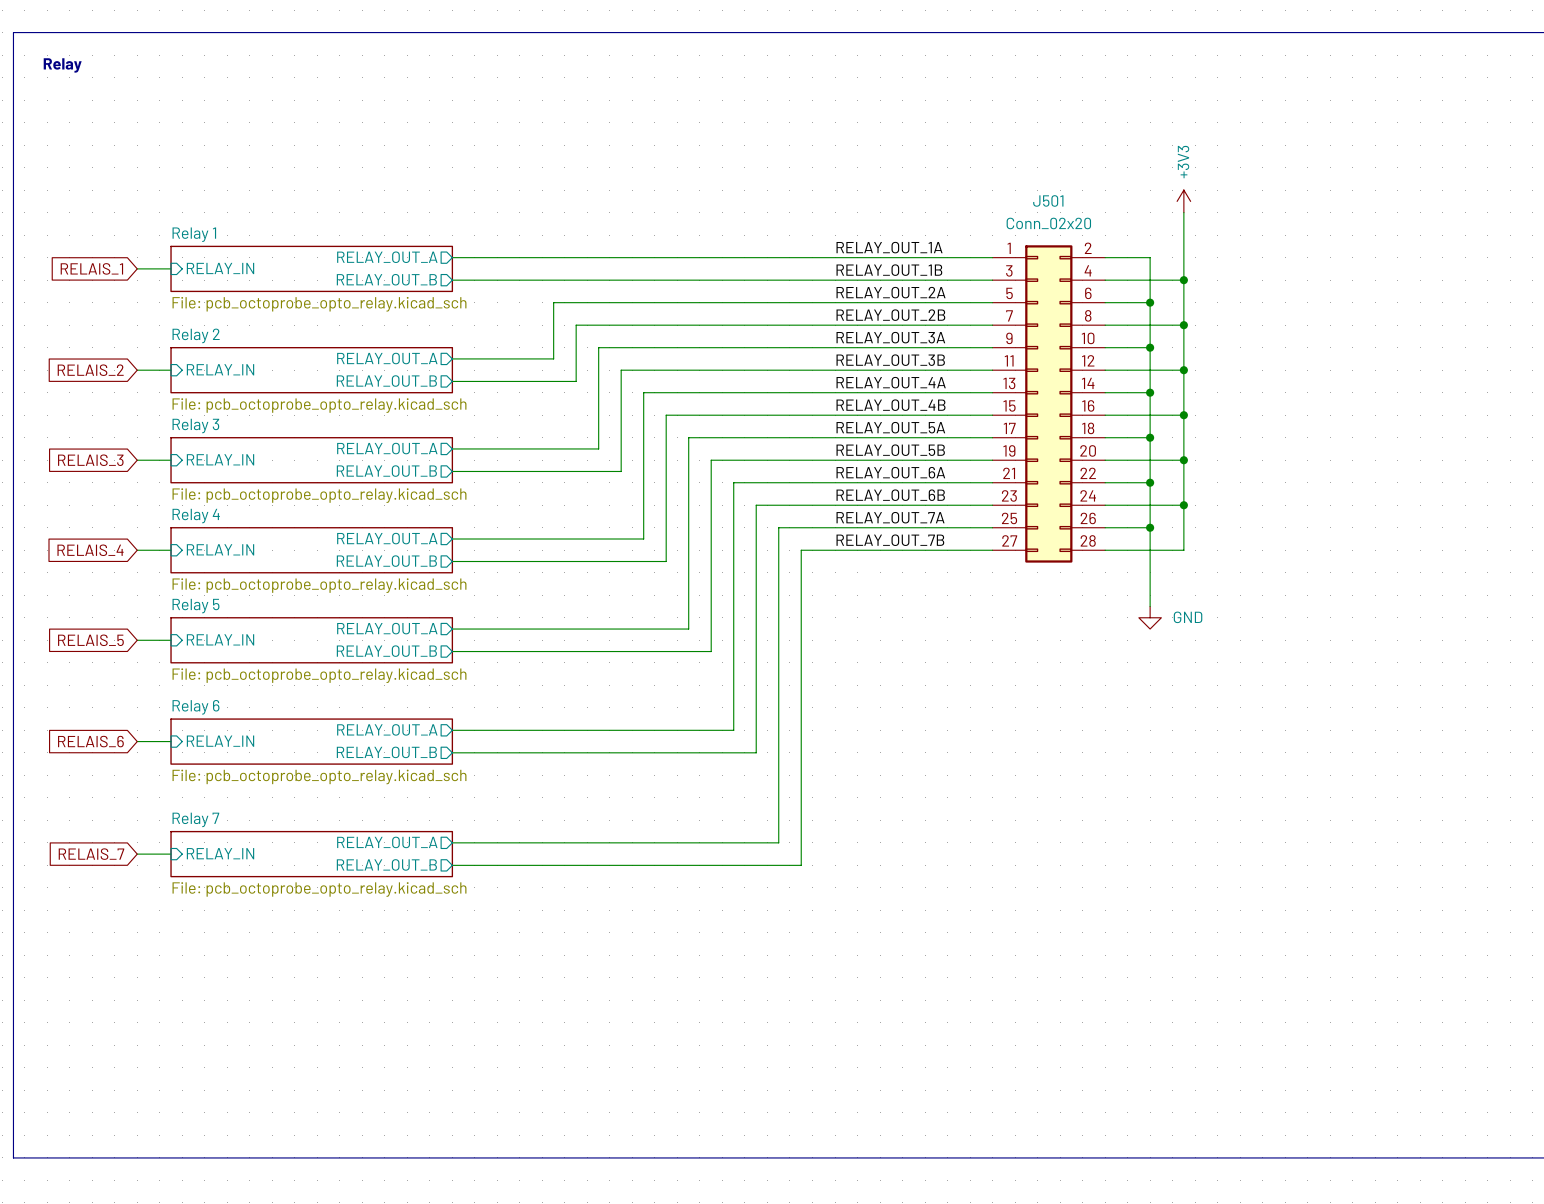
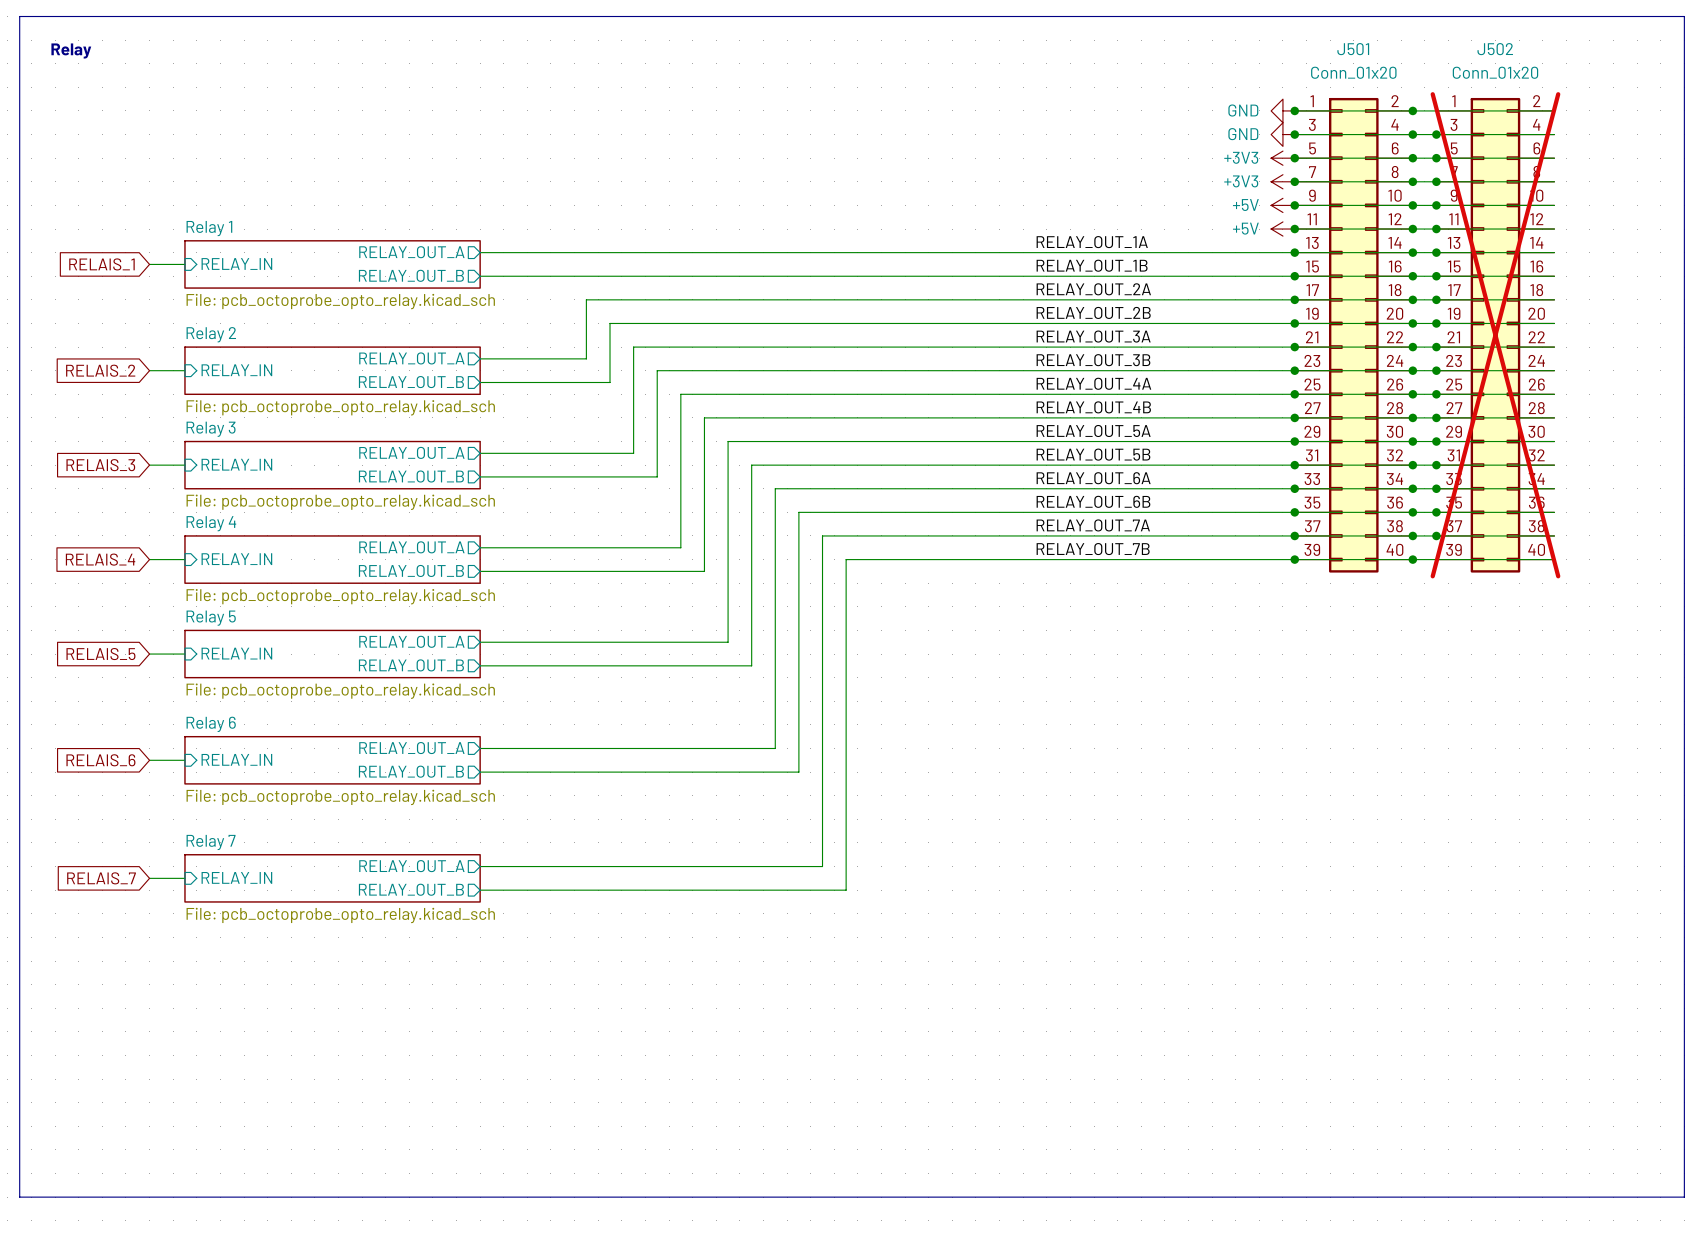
power symbol: none -> GND (1282, 110)
wire: none -> (1294, 110) (1554, 110)
junction: none -> (1294, 110)
junction: none -> (1412, 110)
power symbol: none -> GND (1282, 134)
wire: none -> (1294, 134) (1554, 134)
junction: none -> (1294, 134)
junction: none -> (1412, 134)
junction: none -> (1436, 134)
power symbol: none -> +3V3 (1282, 158)
wire: none -> (1294, 158) (1554, 158)
junction: none -> (1294, 158)
junction: none -> (1412, 158)
junction: none -> (1436, 158)
power symbol: none -> +3V3 (1282, 181)
wire: none -> (1294, 181) (1554, 181)
junction: none -> (1294, 181)
junction: none -> (1412, 181)
junction: none -> (1436, 181)
J501 name position: J501 (1048, 200) -> J501 (1353, 49)
power symbol: +3V3 (1183, 201) -> none
wire: (1183, 212) (1183, 550) -> (1554, 559) (1247, 559)
power symbol: none -> +5V (1282, 205)
wire: none -> (1294, 205) (1554, 205)
junction: none -> (1294, 205)
junction: none -> (1412, 205)
junction: none -> (1436, 205)
J501 value: Conn_02x20 (1048, 223) -> Conn_01x20 (1353, 72)
power symbol: none -> +5V (1282, 229)
wire: none -> (1294, 229) (1554, 229)
junction: none -> (1294, 229)
junction: none -> (1412, 229)
junction: none -> (1436, 229)
J501 symbol: [992, 245, 1106, 563] -> [1294, 97, 1413, 573]
label position: RELAY_OUT_1A (889, 247) -> RELAY_OUT_1A (1092, 242)
wire: (1150, 257) (1150, 606) -> (1212, 252) (1554, 252)
junction: none -> (1294, 252)
junction: none -> (1412, 252)
junction: none -> (1436, 252)
label position: RELAY_OUT_1B (889, 270) -> RELAY_OUT_1B (1092, 265)
wire: none -> (1247, 276) (1554, 276)
junction: (1183, 280) -> none
junction: none -> (1294, 276)
junction: none -> (1412, 276)
junction: none -> (1436, 276)
label position: RELAY_OUT_2A (891, 292) -> RELAY_OUT_2A (1093, 289)
wire: none -> (1212, 299) (1554, 299)
junction: (1150, 302) -> none
junction: none -> (1294, 299)
junction: none -> (1412, 299)
junction: none -> (1436, 299)
label position: RELAY_OUT_2B (890, 315) -> RELAY_OUT_2B (1093, 312)
wire: none -> (1247, 323) (1554, 323)
junction: (1183, 325) -> none
junction: none -> (1294, 323)
junction: none -> (1412, 323)
junction: none -> (1436, 323)
J502: none -> Conn_01x20 (1495, 335)
label position: RELAY_OUT_3A (890, 337) -> RELAY_OUT_3A (1093, 336)
wire: none -> (1212, 347) (1554, 347)
junction: (1150, 347) -> none
junction: none -> (1294, 347)
junction: none -> (1412, 347)
junction: none -> (1436, 347)
label position: RELAY_OUT_3B (890, 360) -> RELAY_OUT_3B (1093, 360)
wire: none -> (1247, 370) (1554, 370)
junction: (1183, 370) -> none
junction: none -> (1294, 370)
junction: none -> (1412, 370)
junction: none -> (1436, 370)
label position: RELAY_OUT_4A (891, 382) -> RELAY_OUT_4A (1093, 383)
wire: none -> (1212, 394) (1554, 394)
junction: (1150, 392) -> none
junction: none -> (1294, 394)
junction: none -> (1412, 394)
junction: none -> (1436, 394)
label position: RELAY_OUT_4B (891, 405) -> RELAY_OUT_4B (1093, 407)
wire: none -> (1247, 417) (1554, 417)
junction: (1183, 415) -> none
junction: none -> (1294, 417)
junction: none -> (1412, 417)
junction: none -> (1436, 417)
label position: RELAY_OUT_5A (890, 427) -> RELAY_OUT_5A (1093, 430)
wire: none -> (1212, 441) (1554, 441)
junction: (1150, 437) -> none
junction: none -> (1294, 441)
junction: none -> (1412, 441)
junction: none -> (1436, 441)
label position: RELAY_OUT_5B (890, 450) -> RELAY_OUT_5B (1093, 454)
wire: none -> (1247, 465) (1554, 465)
junction: (1183, 460) -> none
junction: none -> (1294, 465)
junction: none -> (1412, 465)
junction: none -> (1436, 465)
label position: RELAY_OUT_6A (890, 472) -> RELAY_OUT_6A (1093, 478)
wire: none -> (1212, 488) (1554, 488)
junction: (1150, 482) -> none
junction: none -> (1294, 488)
junction: none -> (1412, 488)
junction: none -> (1436, 488)
label position: RELAY_OUT_6B (890, 495) -> RELAY_OUT_6B (1093, 501)
wire: none -> (1247, 512) (1554, 512)
junction: (1183, 505) -> none
junction: none -> (1294, 512)
junction: none -> (1412, 512)
junction: none -> (1436, 512)
label position: RELAY_OUT_7A (890, 517) -> RELAY_OUT_7A (1093, 525)
wire: none -> (1212, 535) (1554, 535)
junction: (1150, 527) -> none
junction: none -> (1294, 535)
junction: none -> (1412, 535)
junction: none -> (1436, 535)
label position: RELAY_OUT_7B (890, 540) -> RELAY_OUT_7B (1093, 549)
junction: none -> (1294, 559)
junction: none -> (1412, 559)
power symbol: GND (1150, 617) -> none

